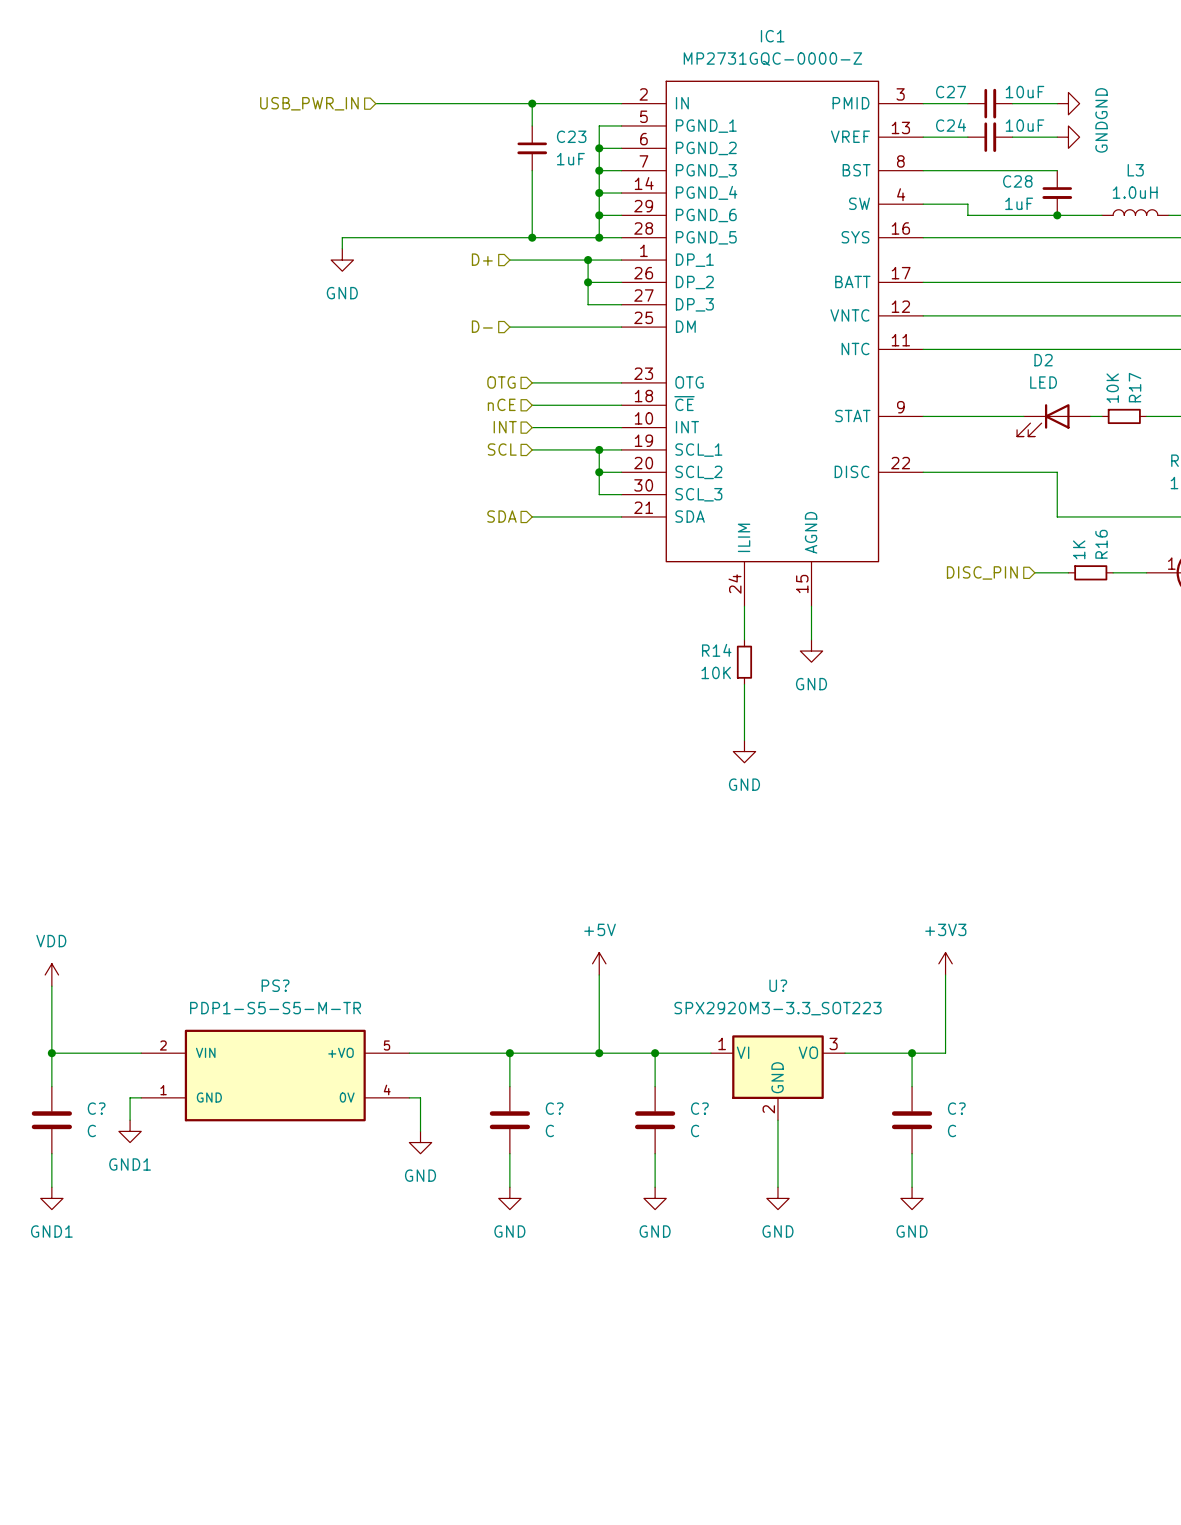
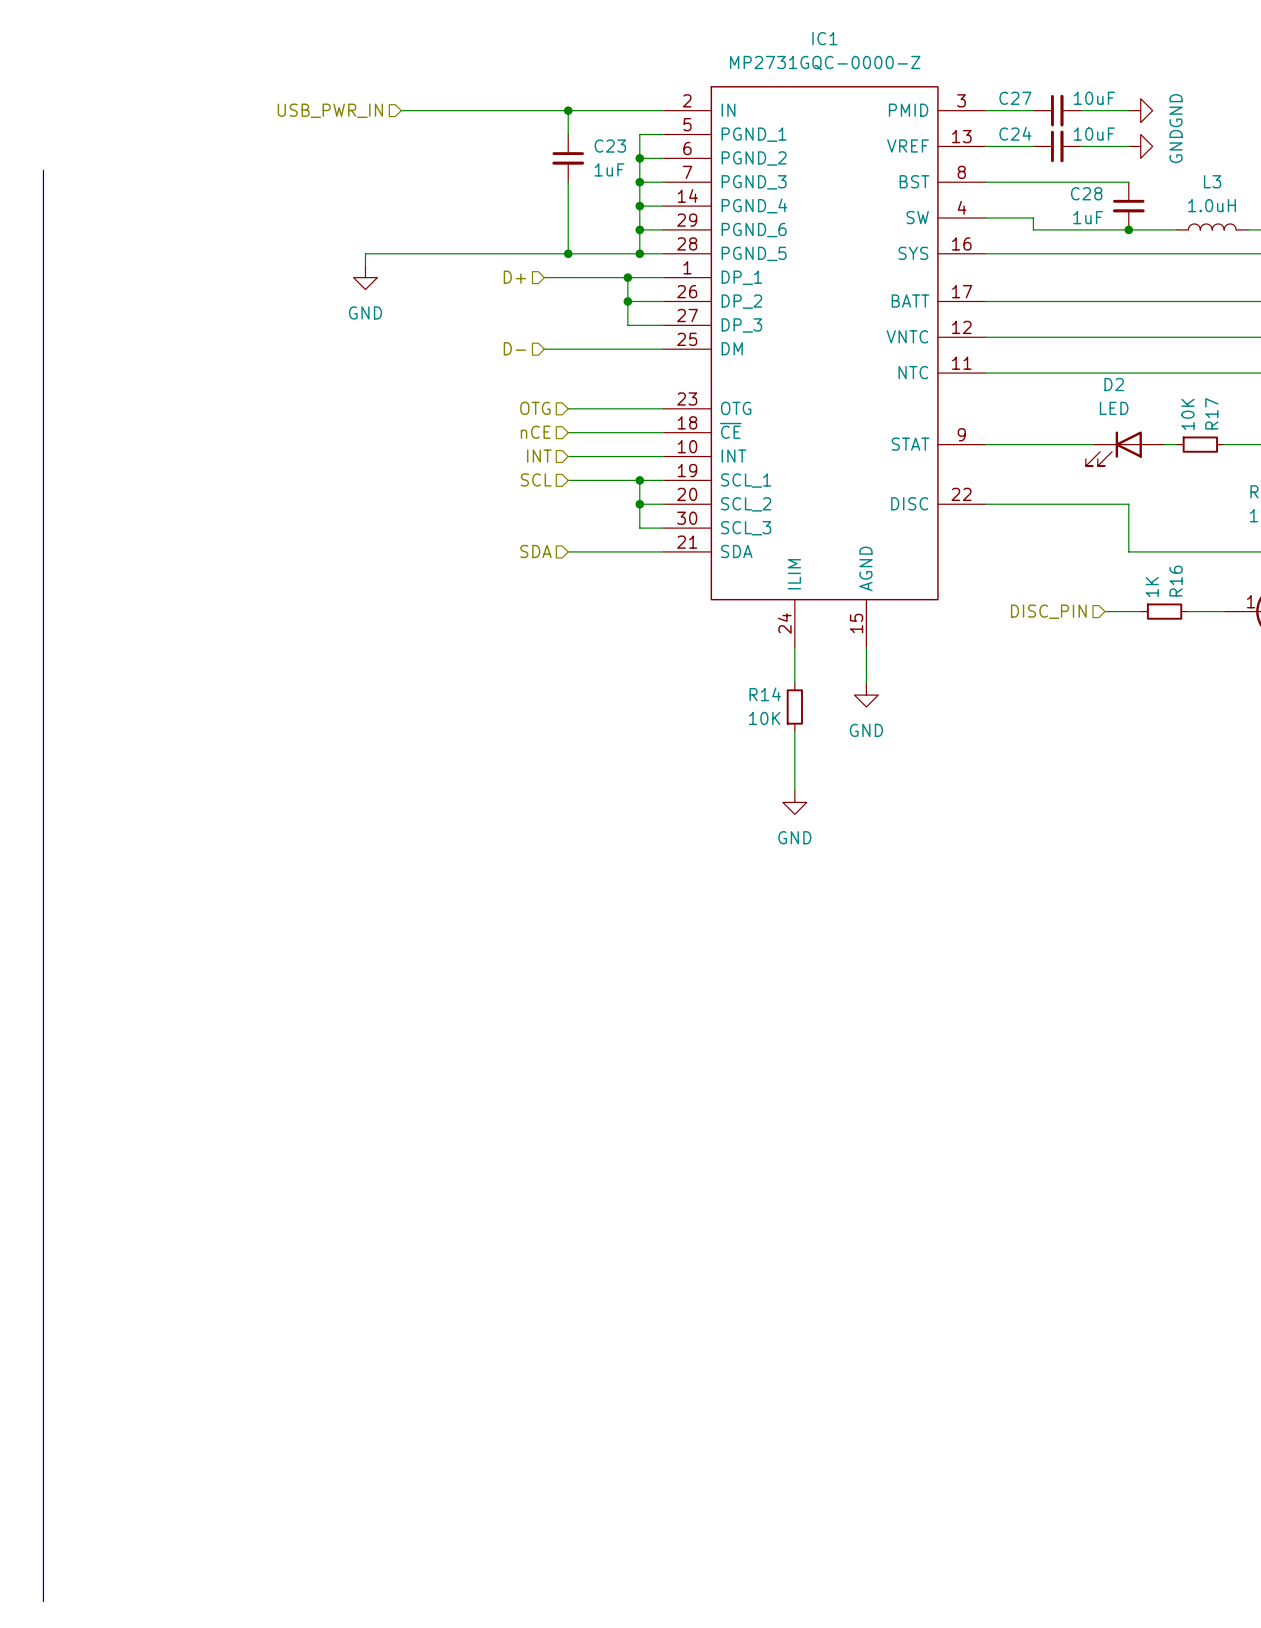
line: none -> (43, 170) (43, 1601)
power symbol: +5V (599, 963) -> none
power symbol: +3V3 (945, 963) -> none
power symbol: VDD (51, 974) -> none
wire: (599, 974) (599, 1053) -> none
wire: (945, 974) (945, 1053) (845, 1053) -> none
wire: (51, 986) (51, 1086) -> none
wire: (51, 1053) (141, 1053) -> none
junction: (51, 1053) -> none
wire: (409, 1053) (710, 1053) -> none
wire: (509, 1053) (509, 1086) -> none
junction: (509, 1053) -> none
junction: (599, 1053) -> none
wire: (655, 1053) (655, 1086) -> none
junction: (655, 1053) -> none
wire: (912, 1053) (912, 1086) -> none
junction: (912, 1053) -> none
PS?: PDP1-S5-S5-M-TR (275, 1075) -> none
U?: SPX2920M3-3.3_SOT223 (777, 1077) -> none
wire: (141, 1097) (130, 1097) (130, 1120) -> none
wire: (409, 1097) (420, 1097) (420, 1131) -> none
C?: C (51, 1120) -> none
C?: C (509, 1120) -> none
C?: C (655, 1120) -> none
wire: (777, 1120) (777, 1187) -> none
C?: C (912, 1120) -> none
power symbol: GND1 (130, 1131) -> none
power symbol: GND (420, 1142) -> none
wire: (51, 1153) (51, 1187) -> none
wire: (509, 1153) (509, 1187) -> none
wire: (655, 1153) (655, 1187) -> none
wire: (912, 1153) (912, 1187) -> none
power symbol: GND1 (51, 1198) -> none
power symbol: GND (509, 1198) -> none
power symbol: GND (655, 1198) -> none
power symbol: GND (777, 1198) -> none
power symbol: GND (912, 1198) -> none

